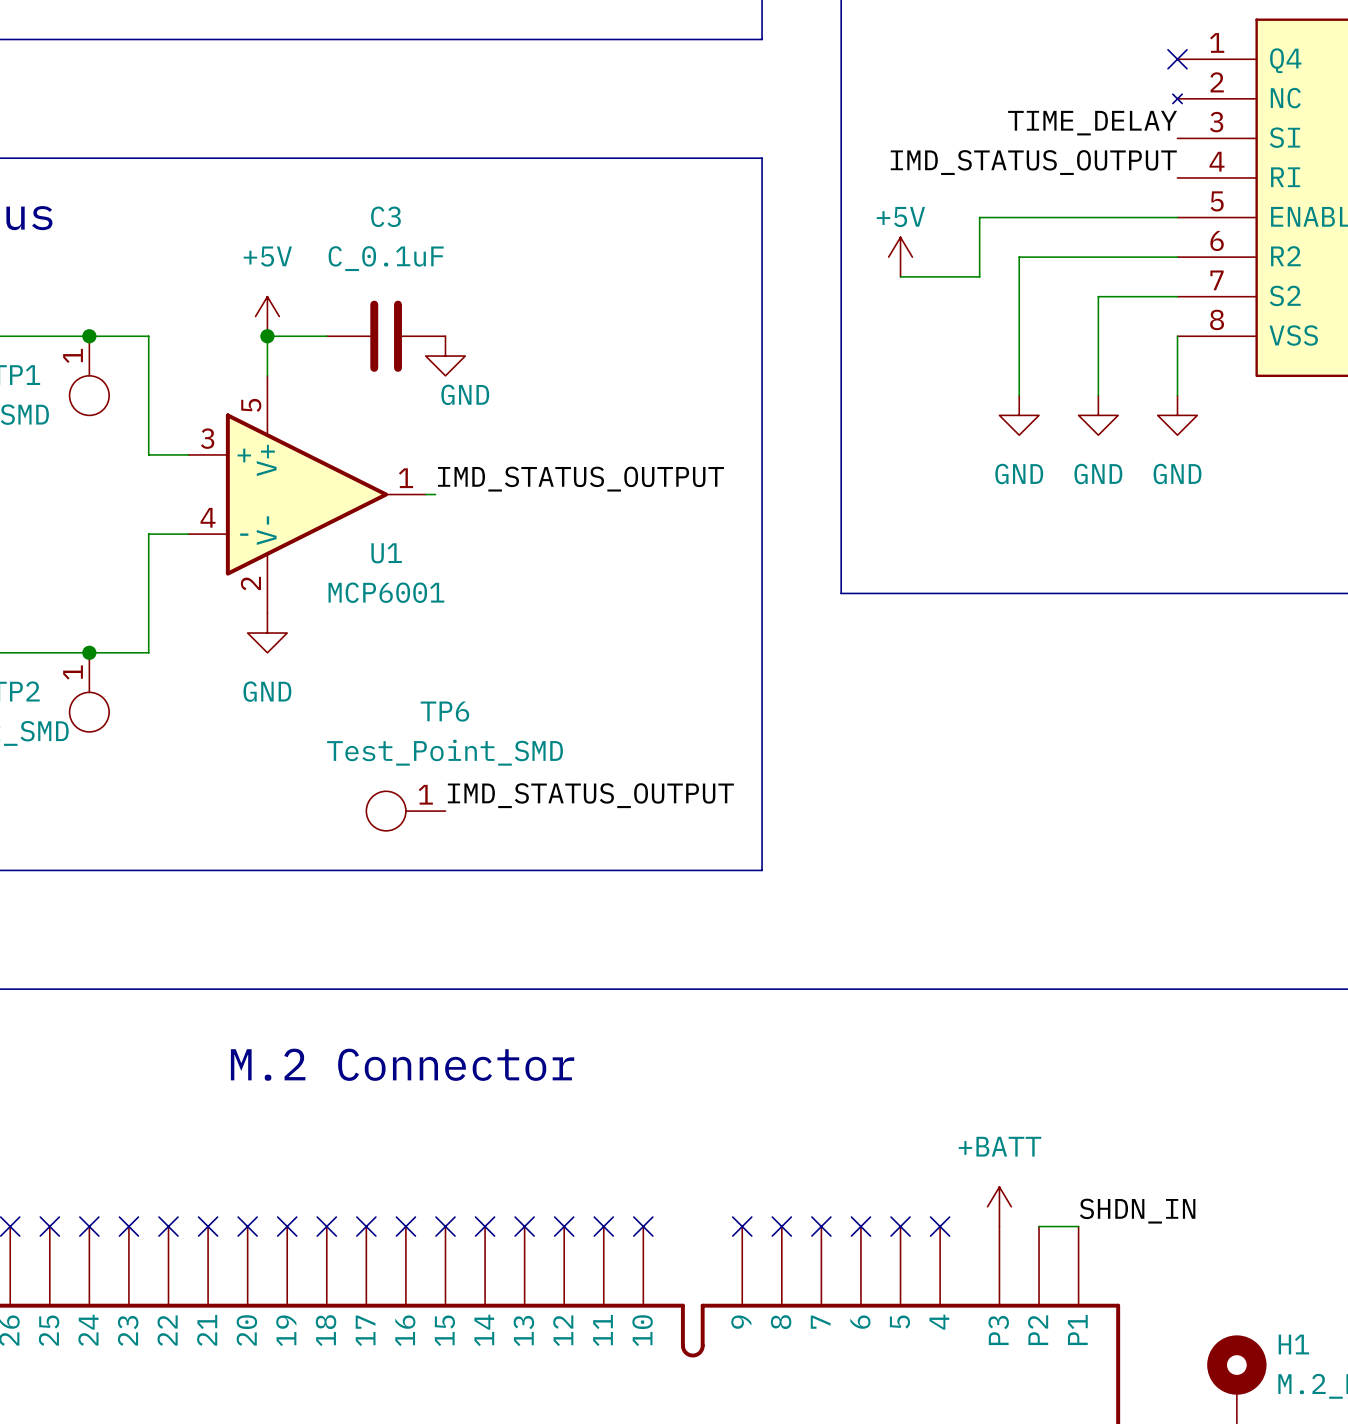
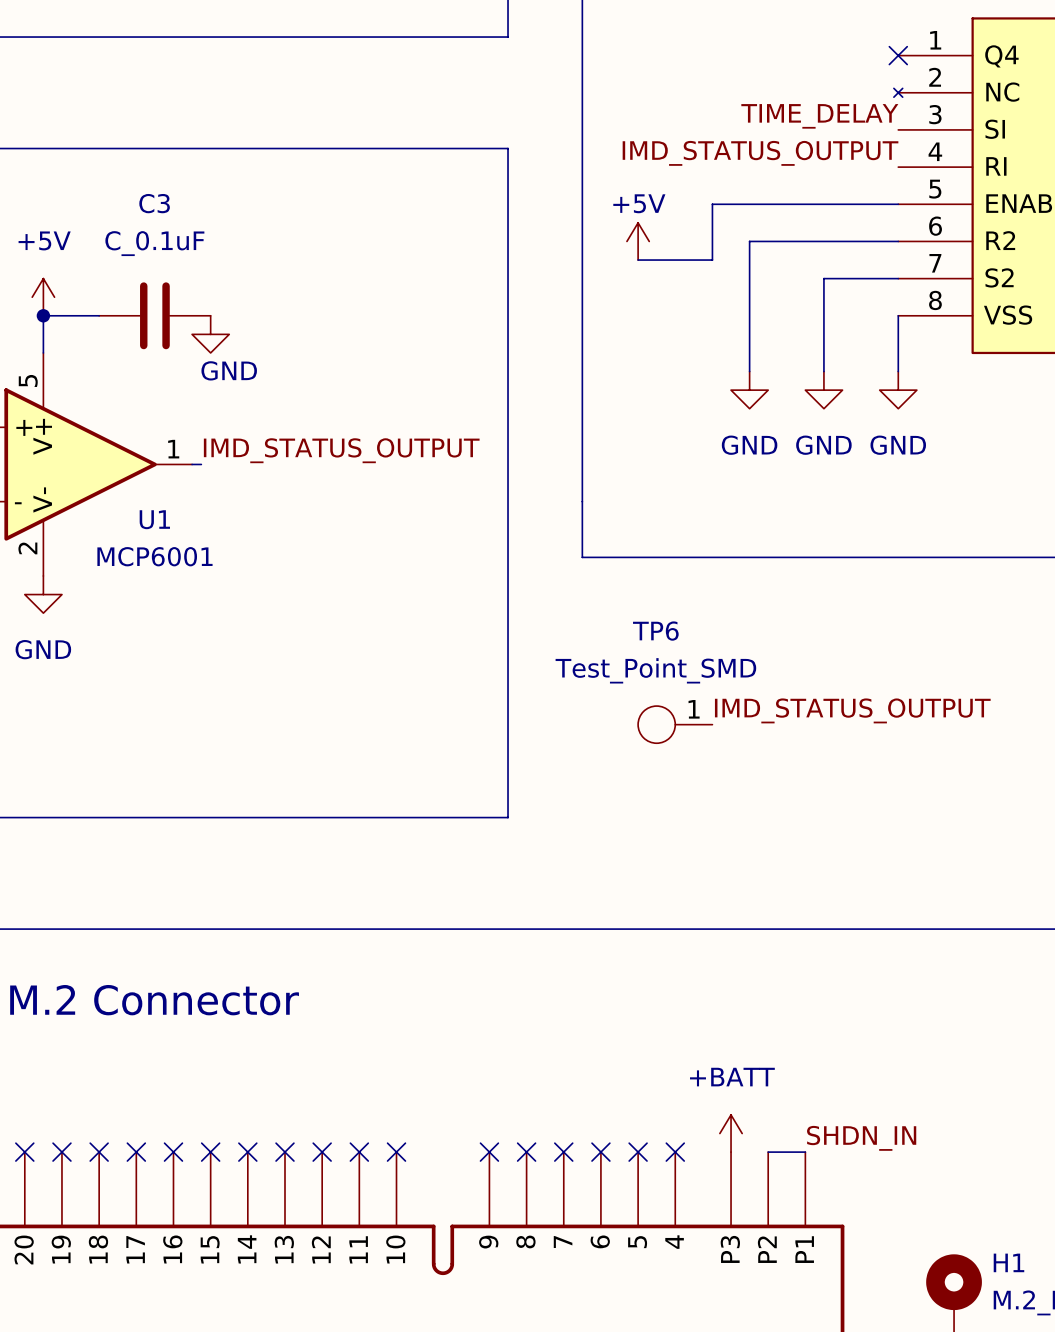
TP6 name position: TP6 (444, 711) -> TP6 (655, 631)
TP6 value position: Test_Point_SMD (445, 752) -> Test_Point_SMD (655, 670)
label: none -> IMD_STATUS_OUTPUT (852, 710)
label: IMD_STATUS_OUTPUT (590, 795) -> none
TP6 position: (405, 811) -> (675, 724)

